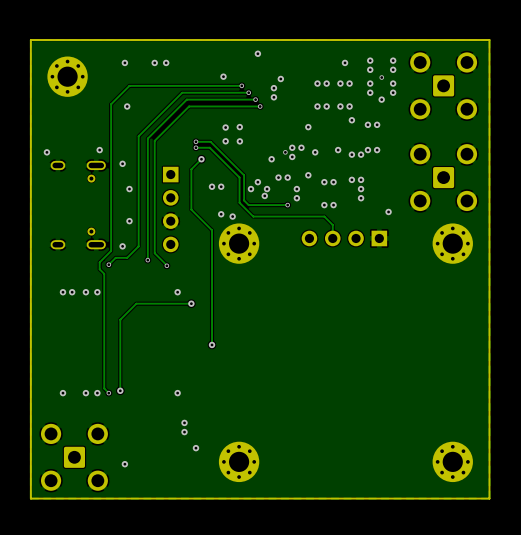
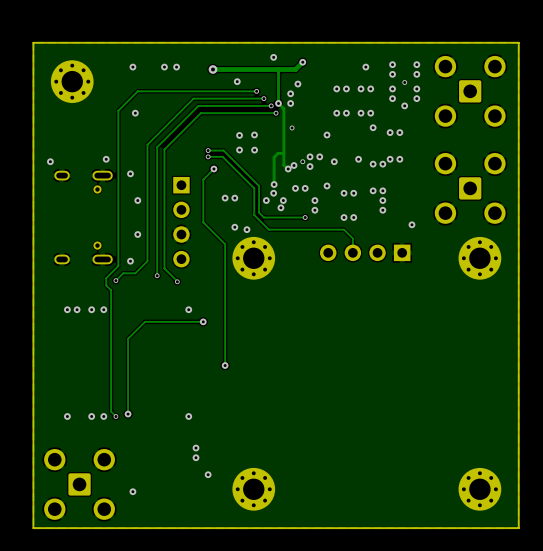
track: none -> (302, 62) (295, 69) (212, 69)
via: none -> (302, 62)
via: none -> (212, 69)
track: none -> (278, 69) (278, 103) (283, 108) (283, 165) (285, 167)
via: none -> (278, 103)
via: none -> (292, 127)
track: none -> (283, 153) (278, 153) (274, 157) (274, 184)
via: none -> (294, 165)
via: none -> (274, 184)

